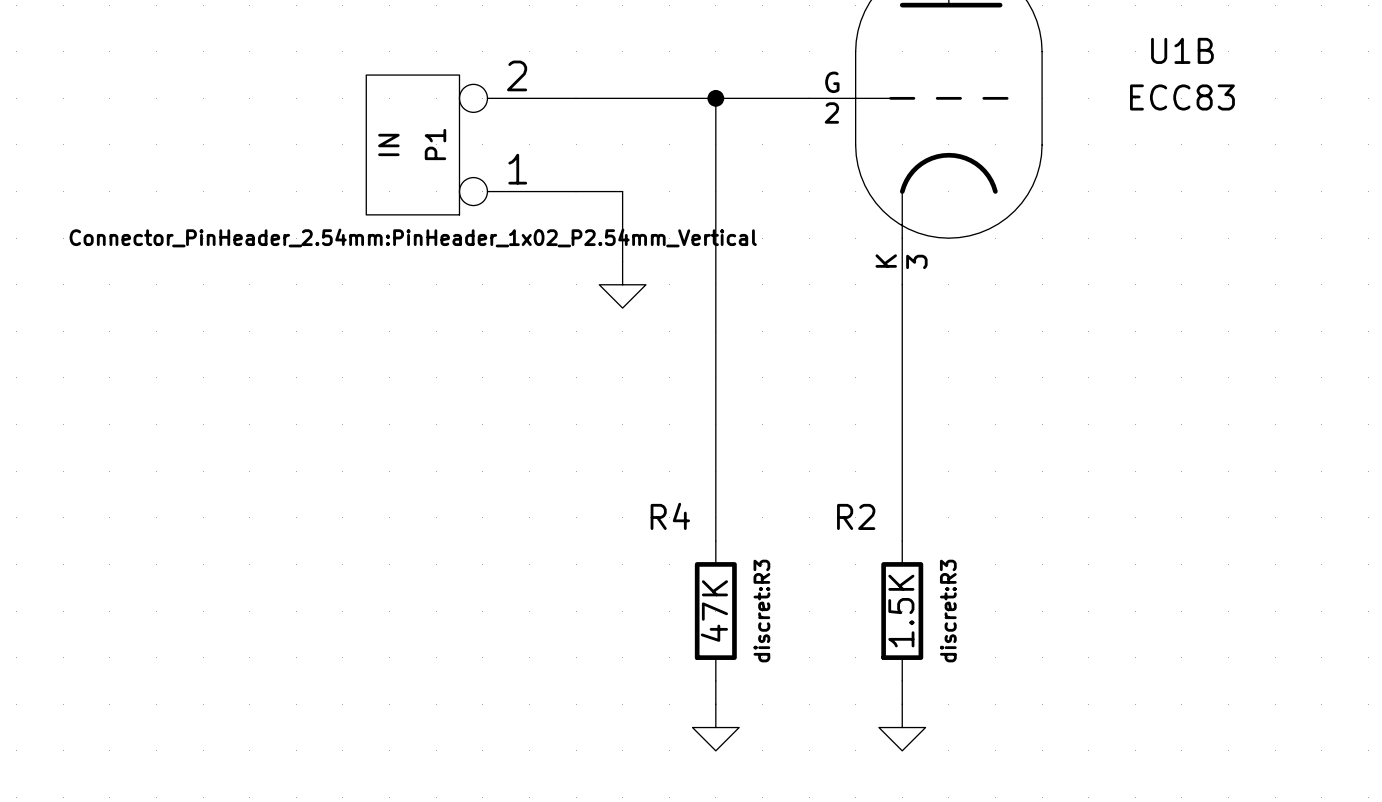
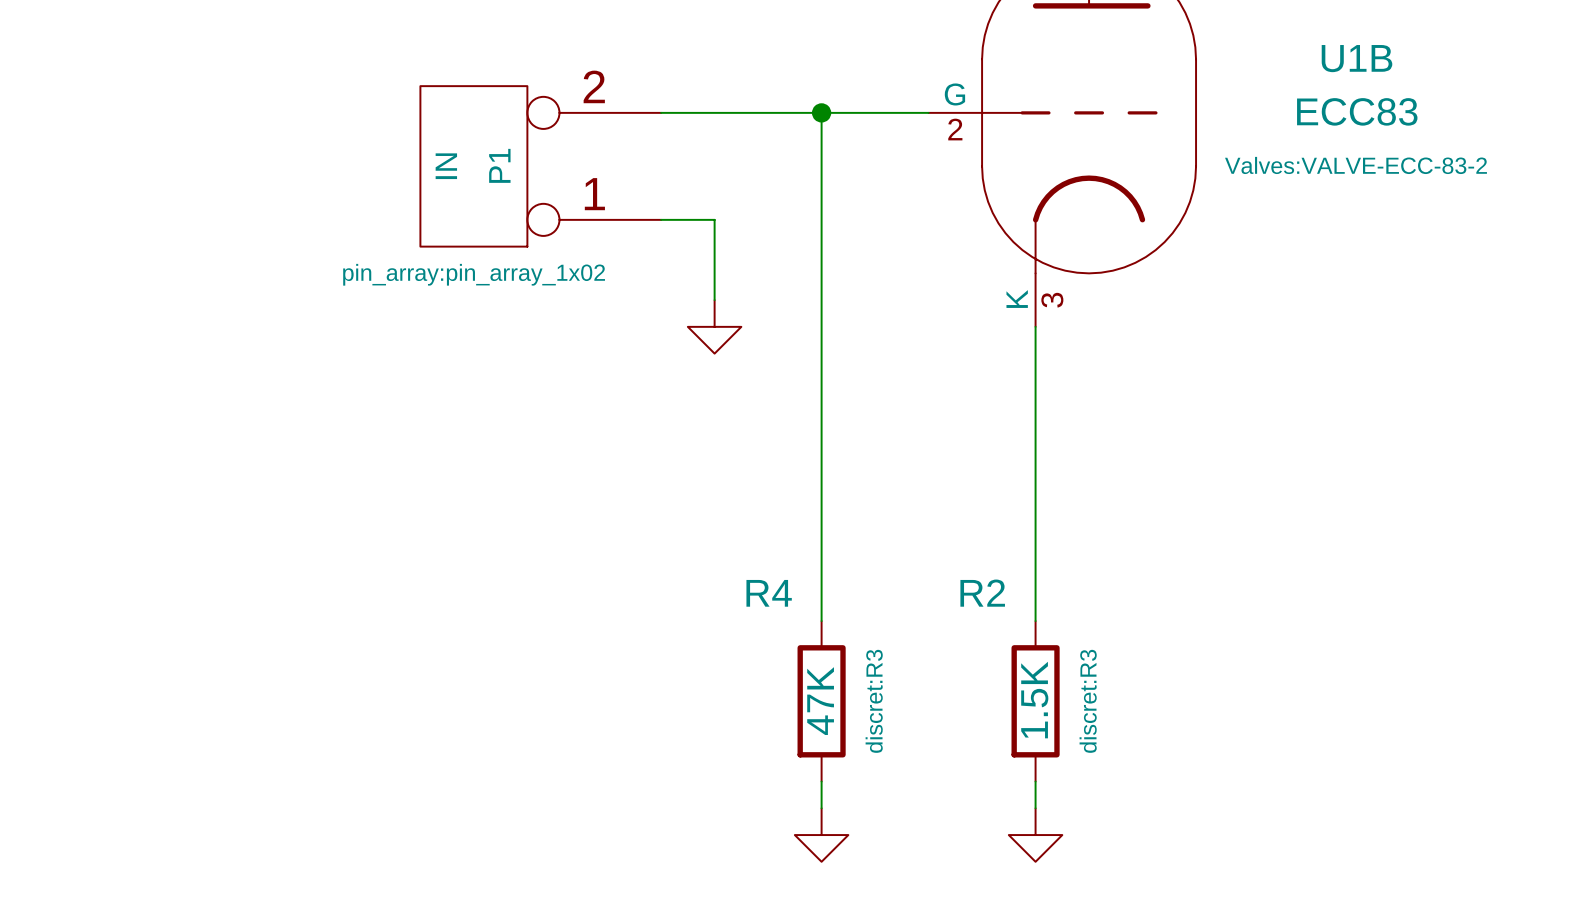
U1B text: none -> Valves:VALVE-ECC-83-2 (1355, 165)
P1 text: Connector_PinHeader_2.54mm:PinHeader_1x02_P2.54mm_Vertical (413, 237) -> pin_array:pin_array_1x02 (474, 274)

